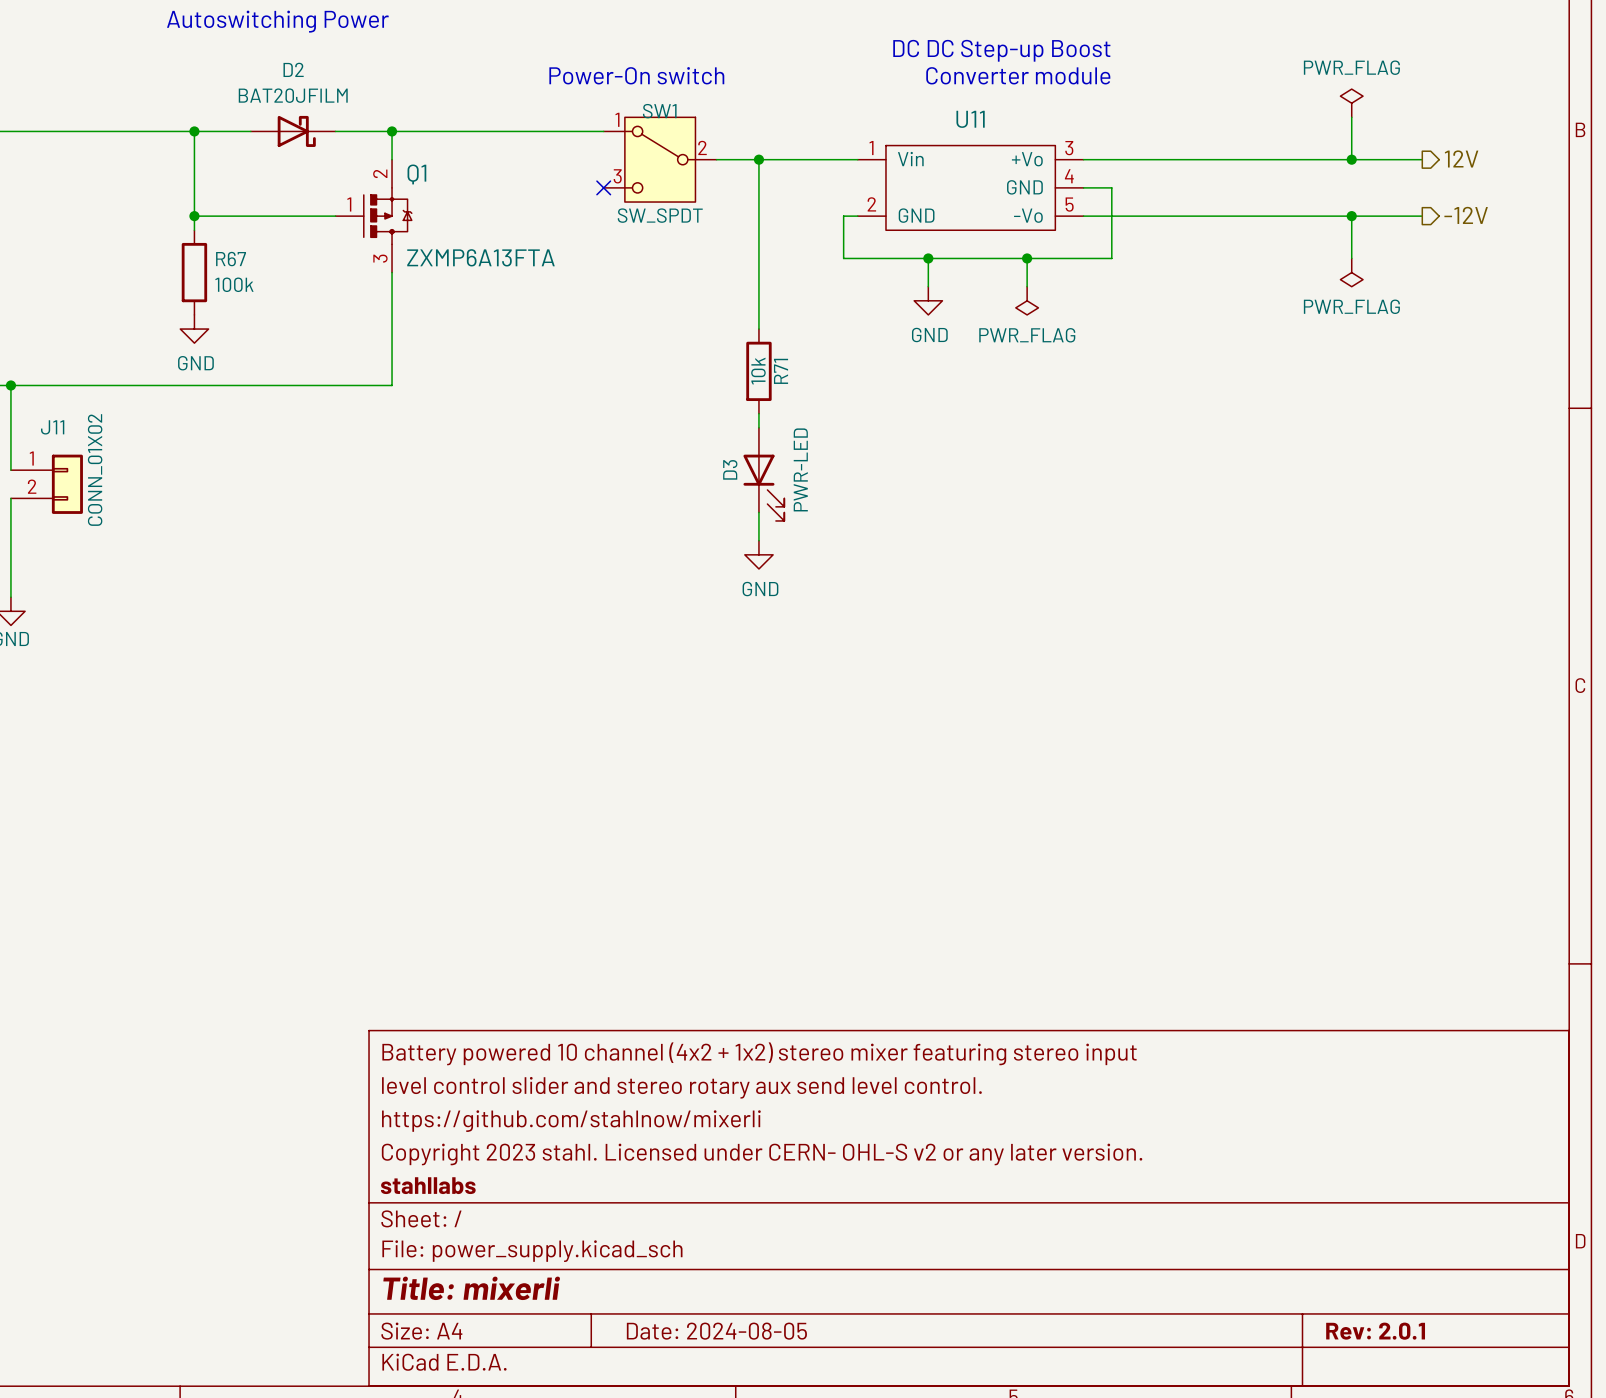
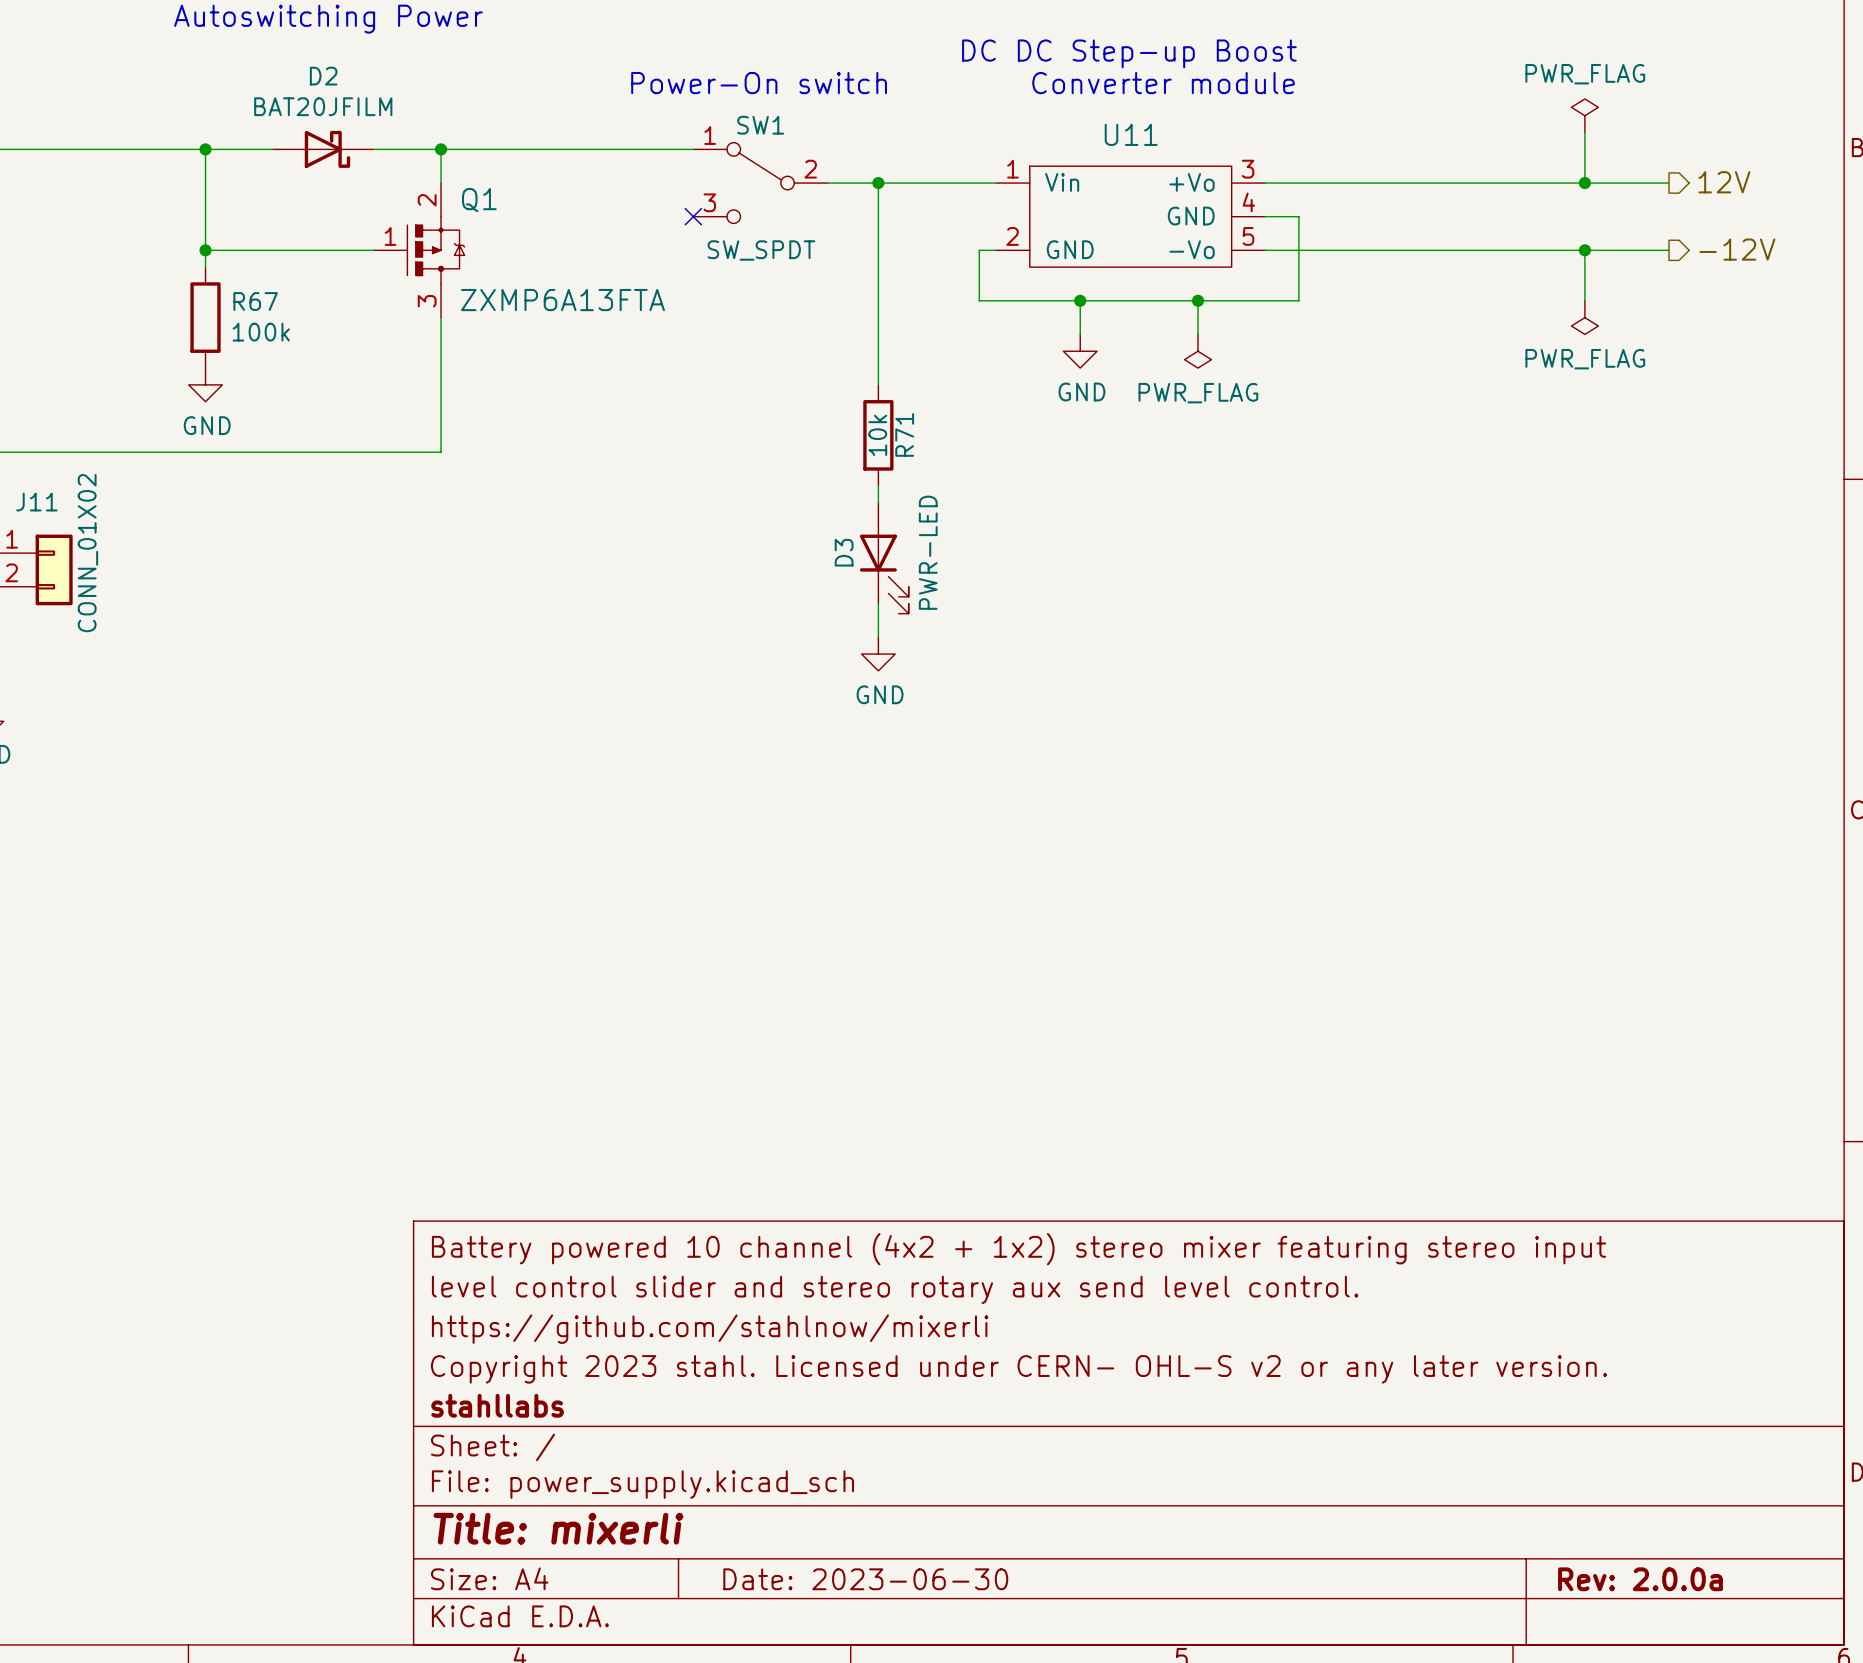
SW1 symbol: [603, 117, 717, 203] -> [693, 142, 828, 224]
title block: Date: 2024-08-05 (716, 1331) -> Date: 2023-06-30 (865, 1579)
title block: Rev: 2.0.1 (1375, 1331) -> Rev: 2.0.0a (1640, 1579)

